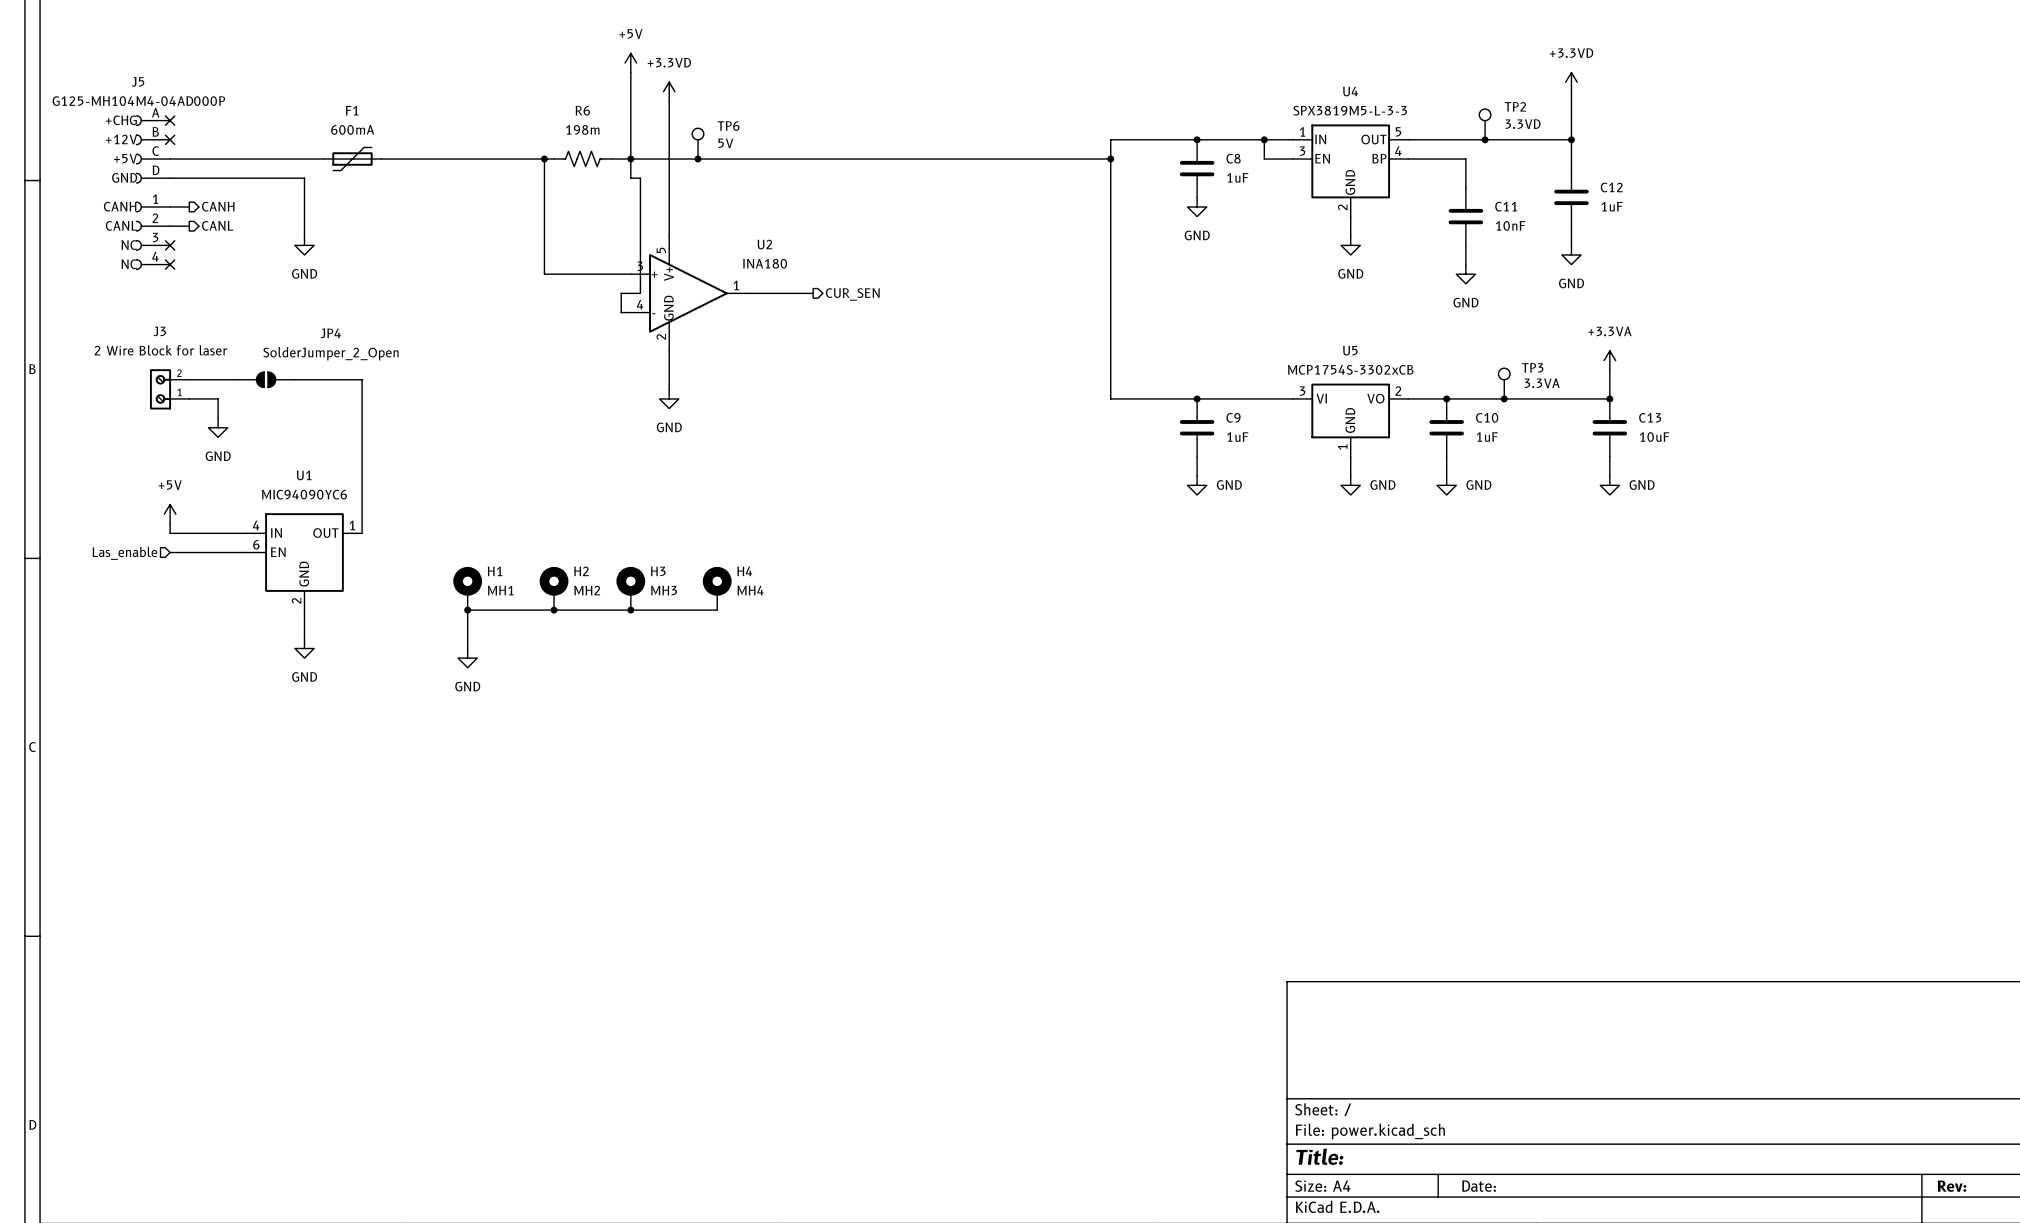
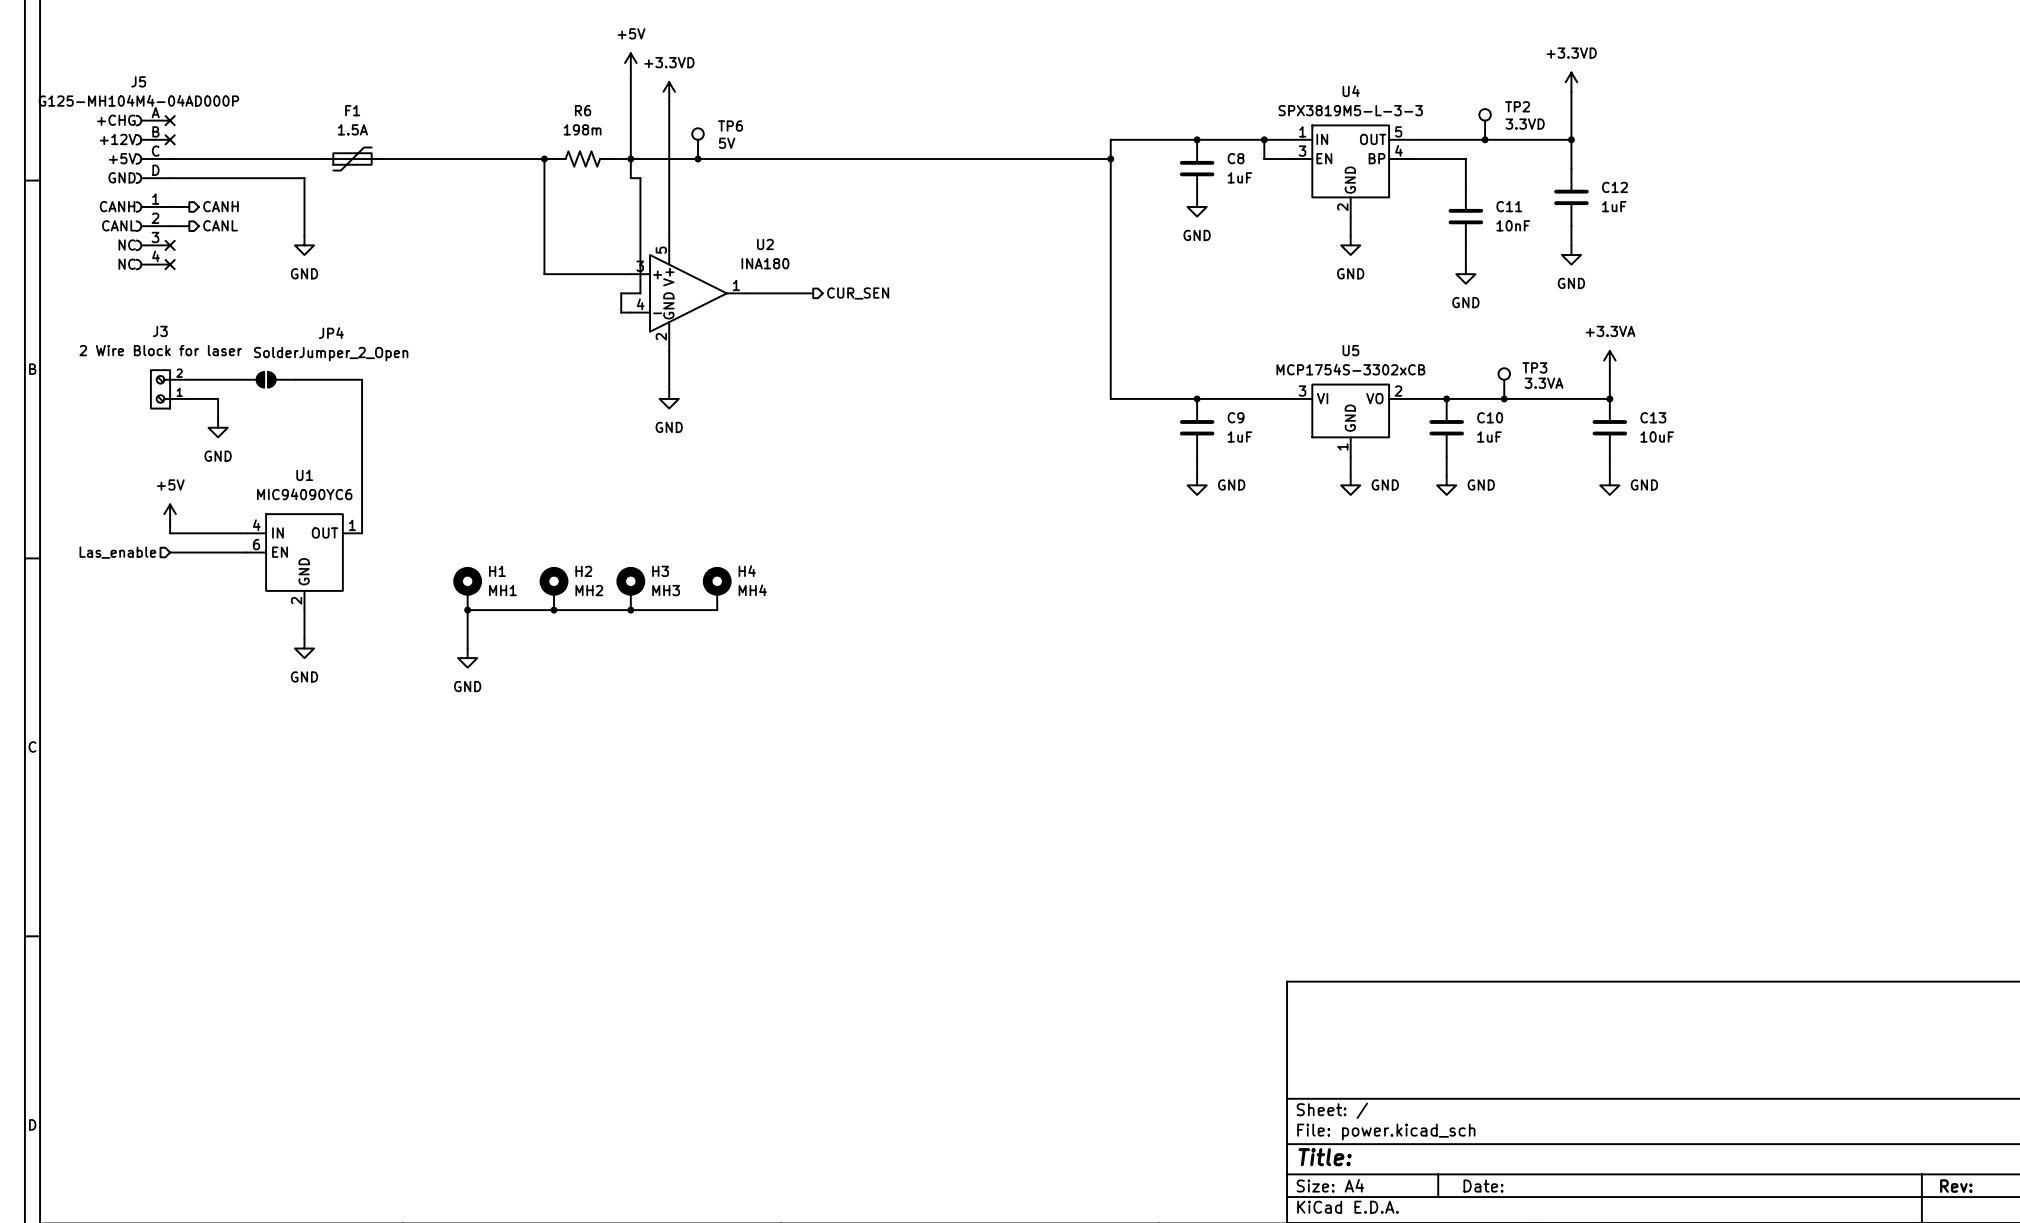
F1 value: 600mA (352, 129) -> 1.5A (352, 129)

